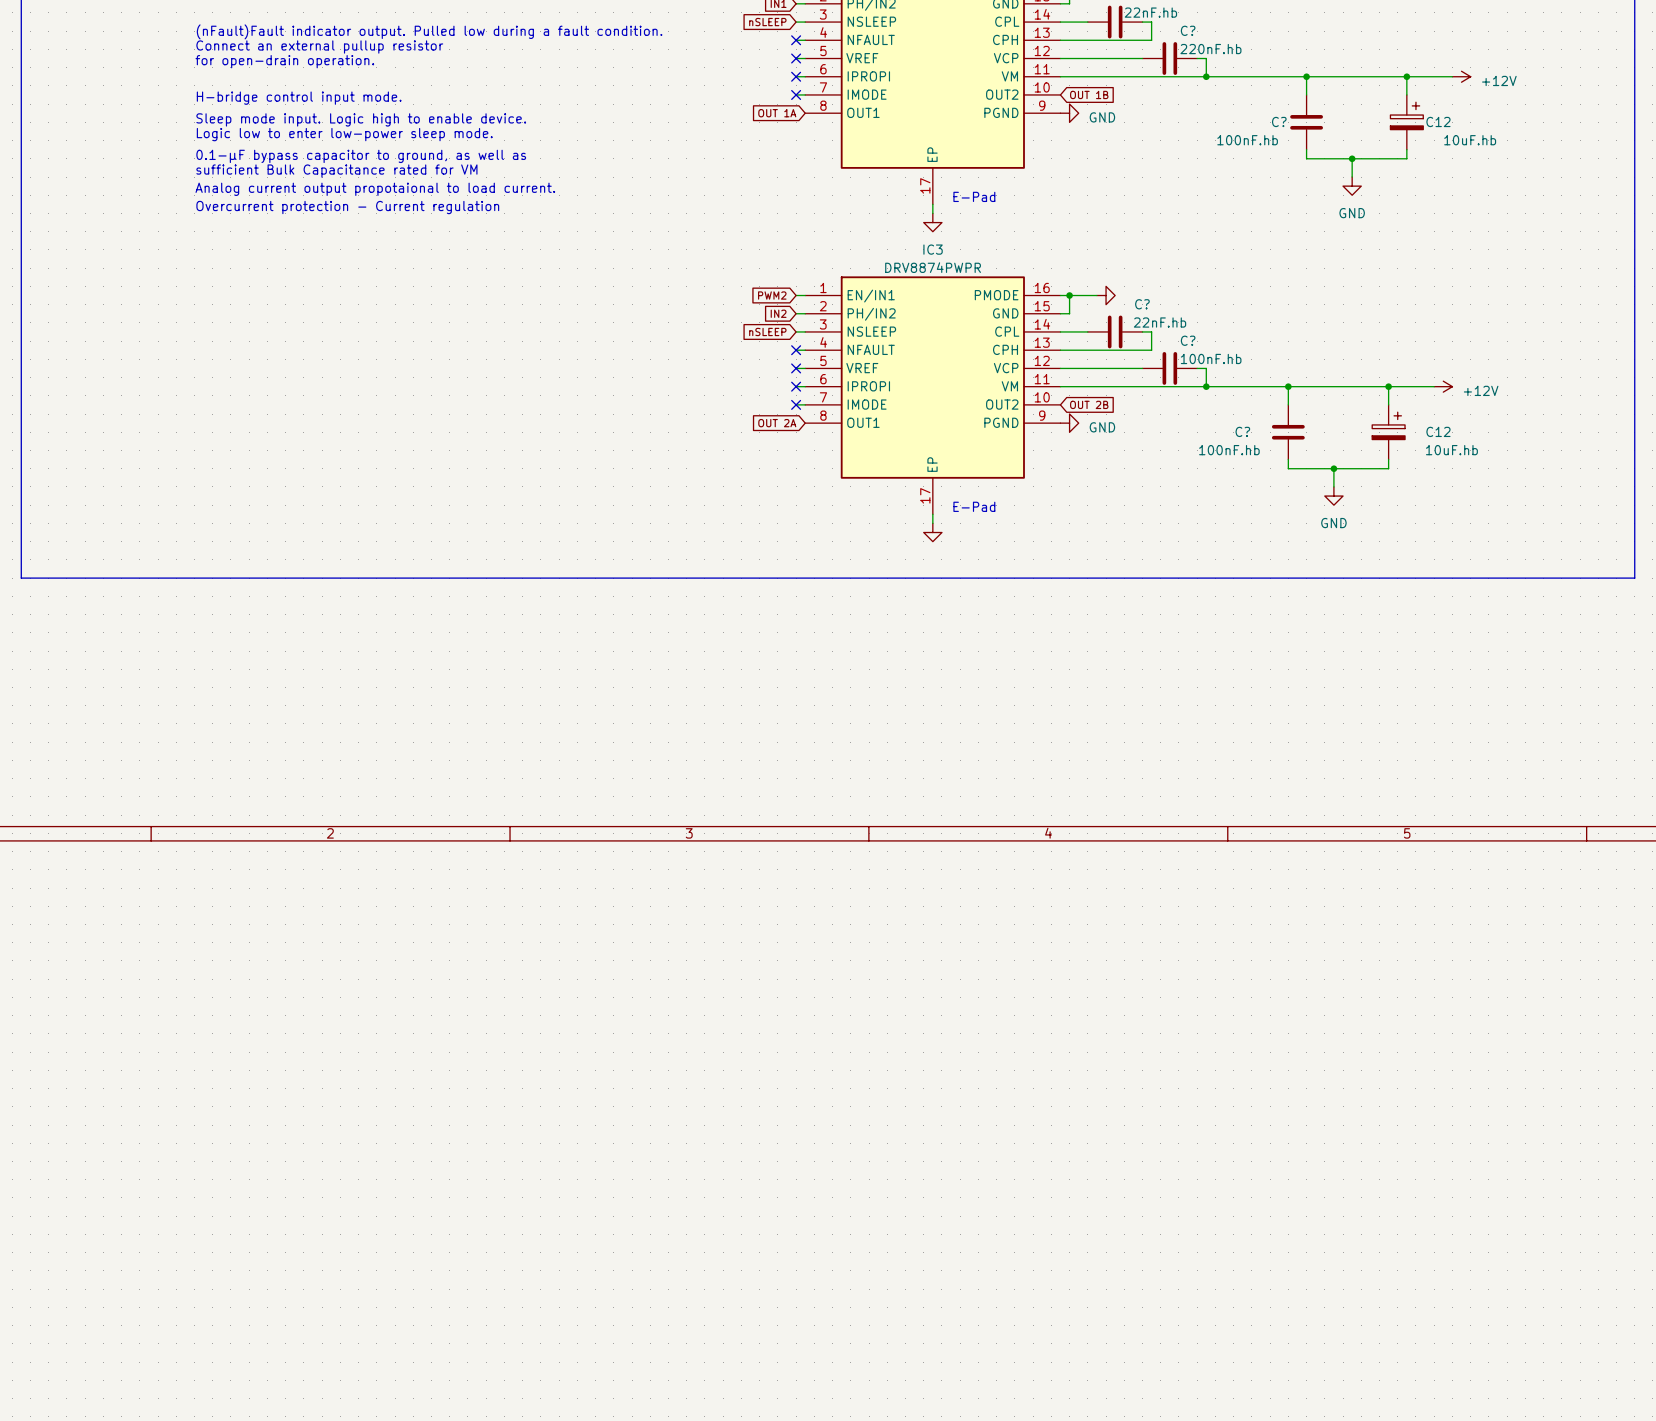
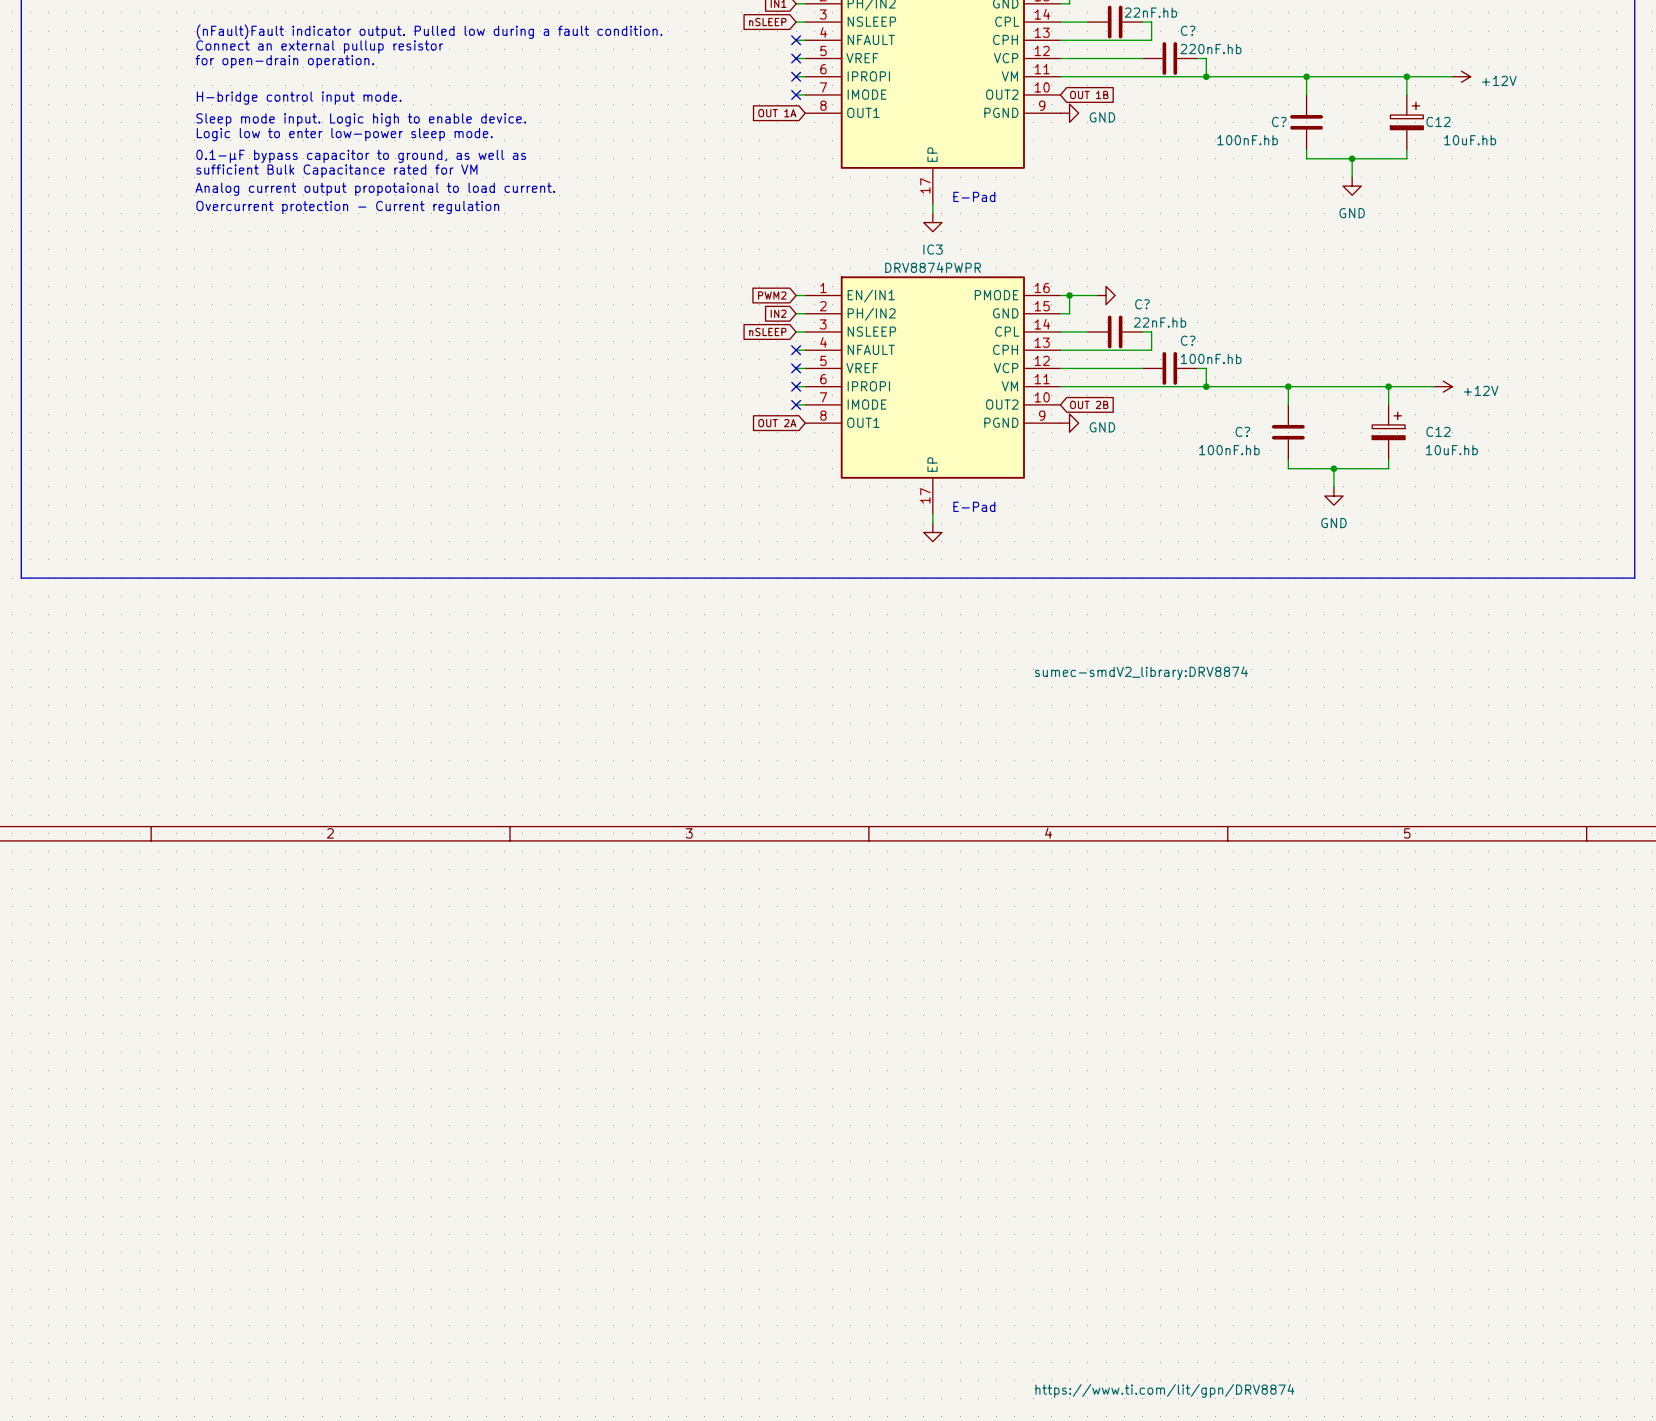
part text: none -> sumec-smdV2_library:DRV8874 (1141, 673)
part text: none -> https://www.ti.com/lit/gpn/DRV8874 (1164, 1390)

